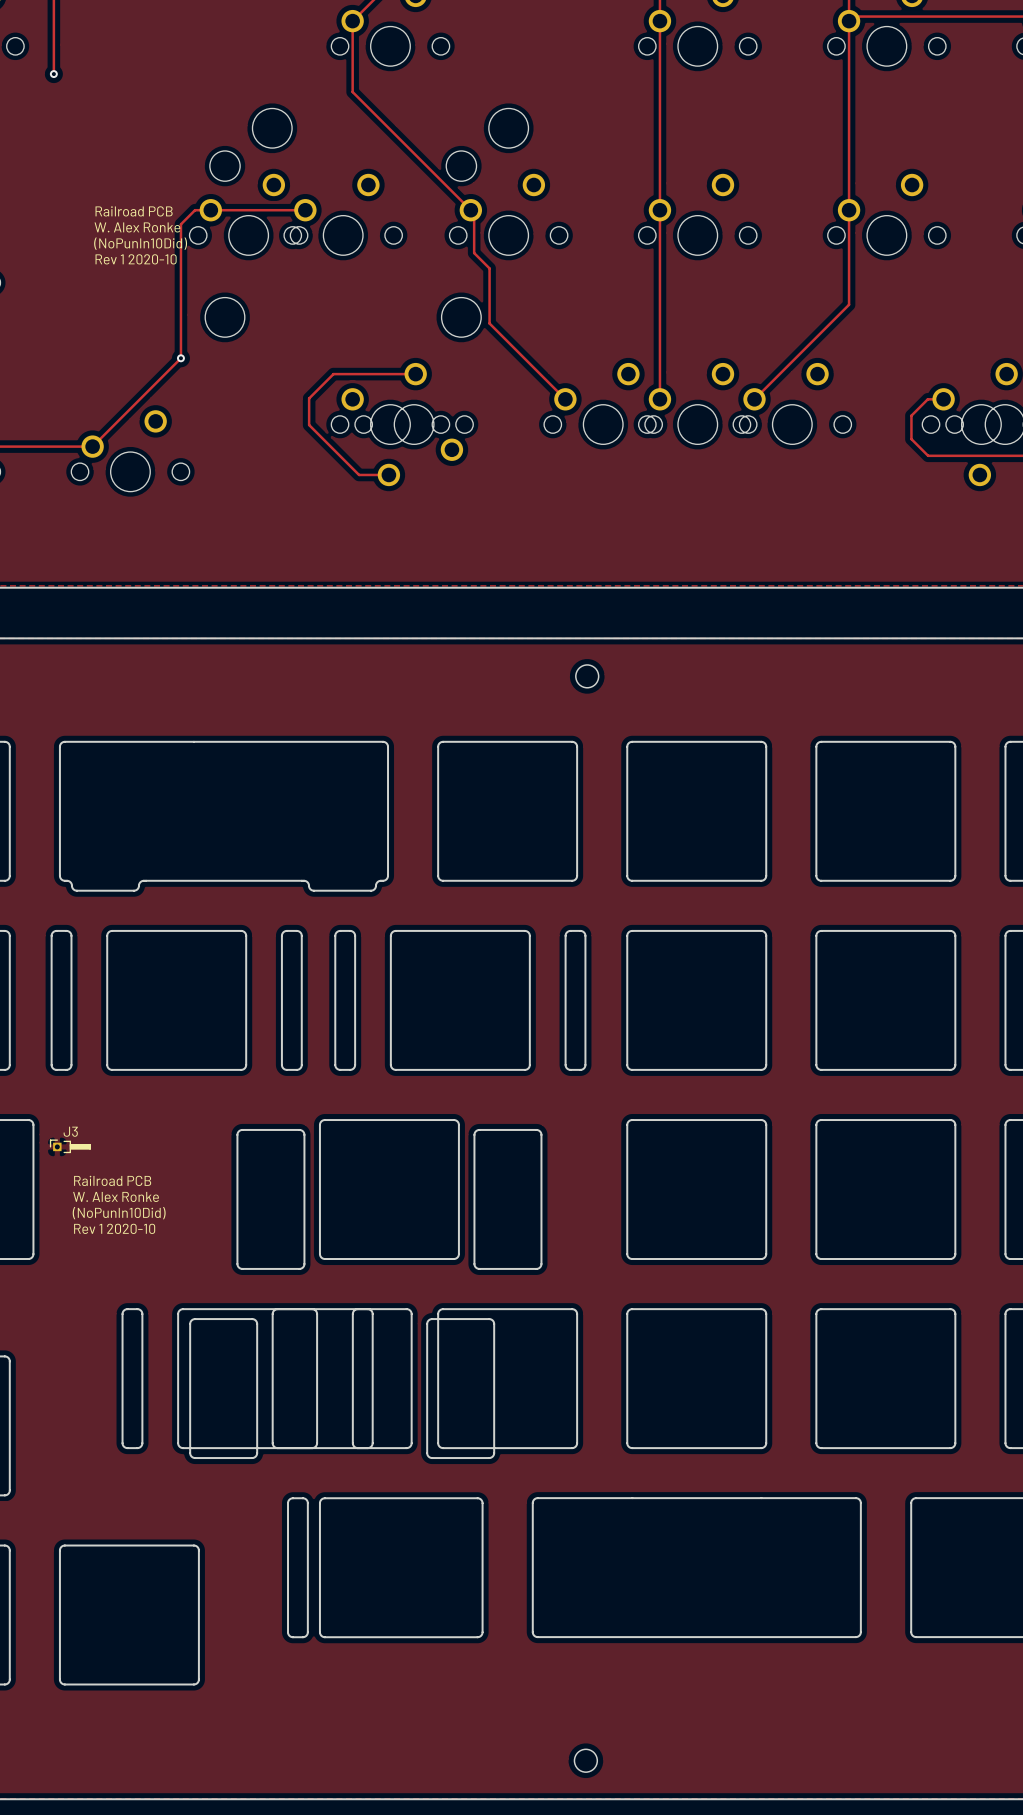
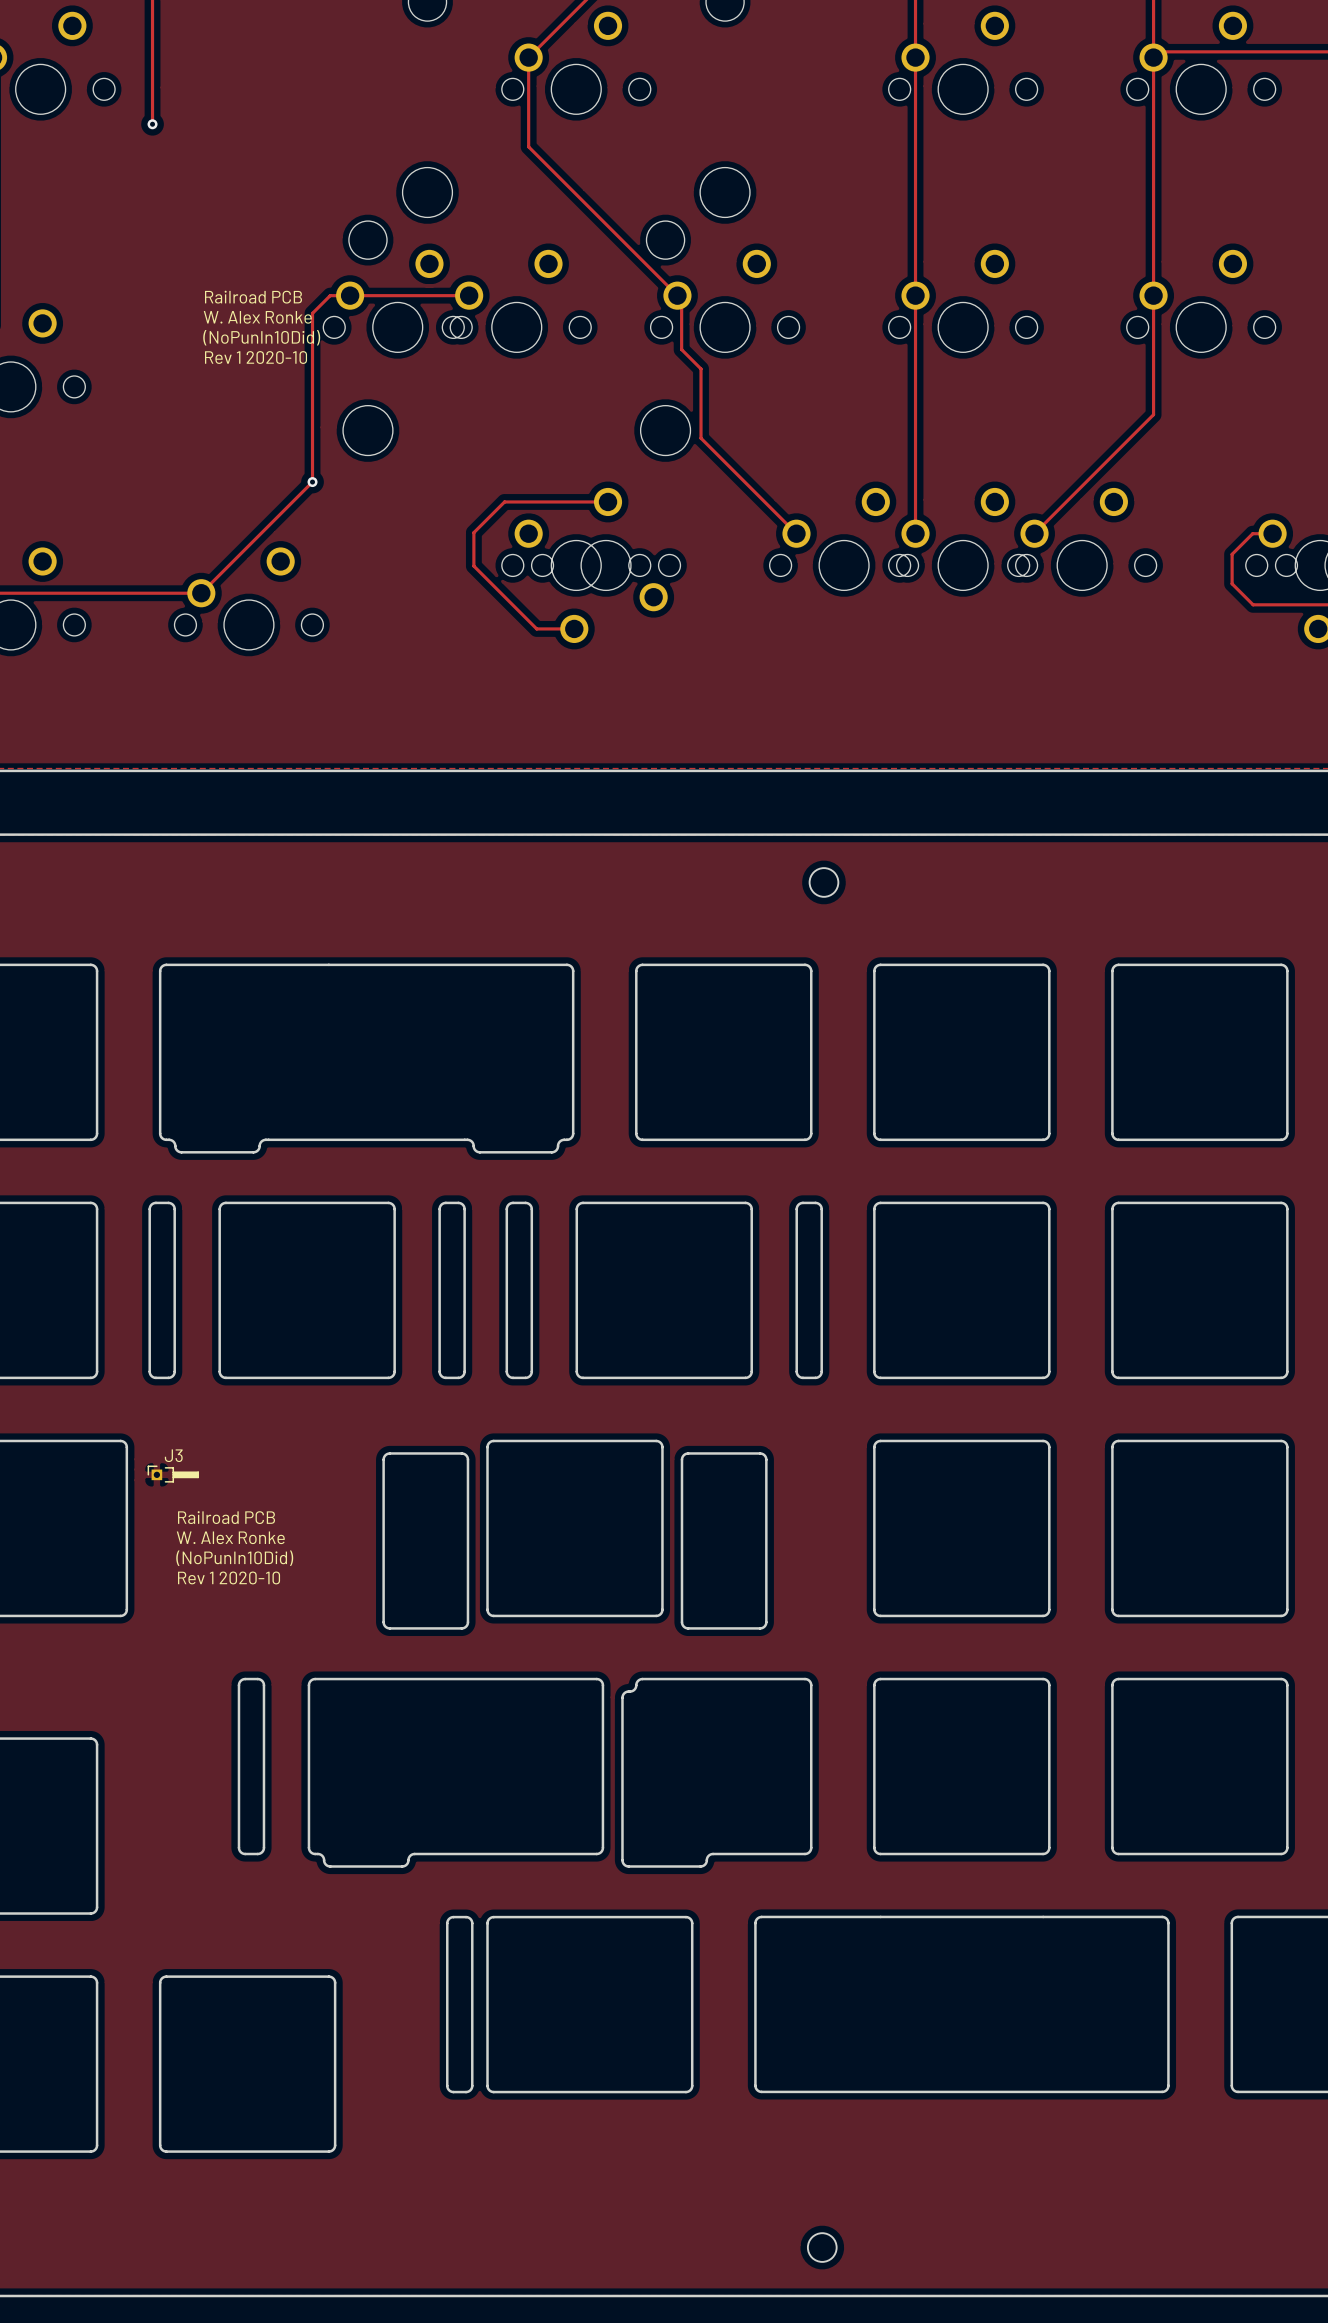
board edge: (277, 1309) (272, 1314) (272, 1443) (277, 1448) -> none
board edge: (312, 1309) (317, 1314) (317, 1443) (312, 1448) -> none
board edge: (357, 1309) (352, 1314) (352, 1443) (357, 1448) -> none
board edge: (367, 1309) (372, 1314) (372, 1443) (367, 1448) -> none
board edge: (438, 1314) (438, 1445) (443, 1448) (499, 1448) -> (636, 1685) (634, 1689) (630, 1691)
board edge: (433, 1319) (489, 1319) (493, 1322) (494, 1453) -> (713, 1853) (708, 1855) (706, 1860)
board edge: (185, 1448) (262, 1448) -> (317, 1853) (322, 1855) (324, 1860)
board edge: (190, 1453) (190, 1324) (195, 1319) (252, 1319) (256, 1322) (257, 1453) -> (414, 1853) (410, 1855) (408, 1860)

